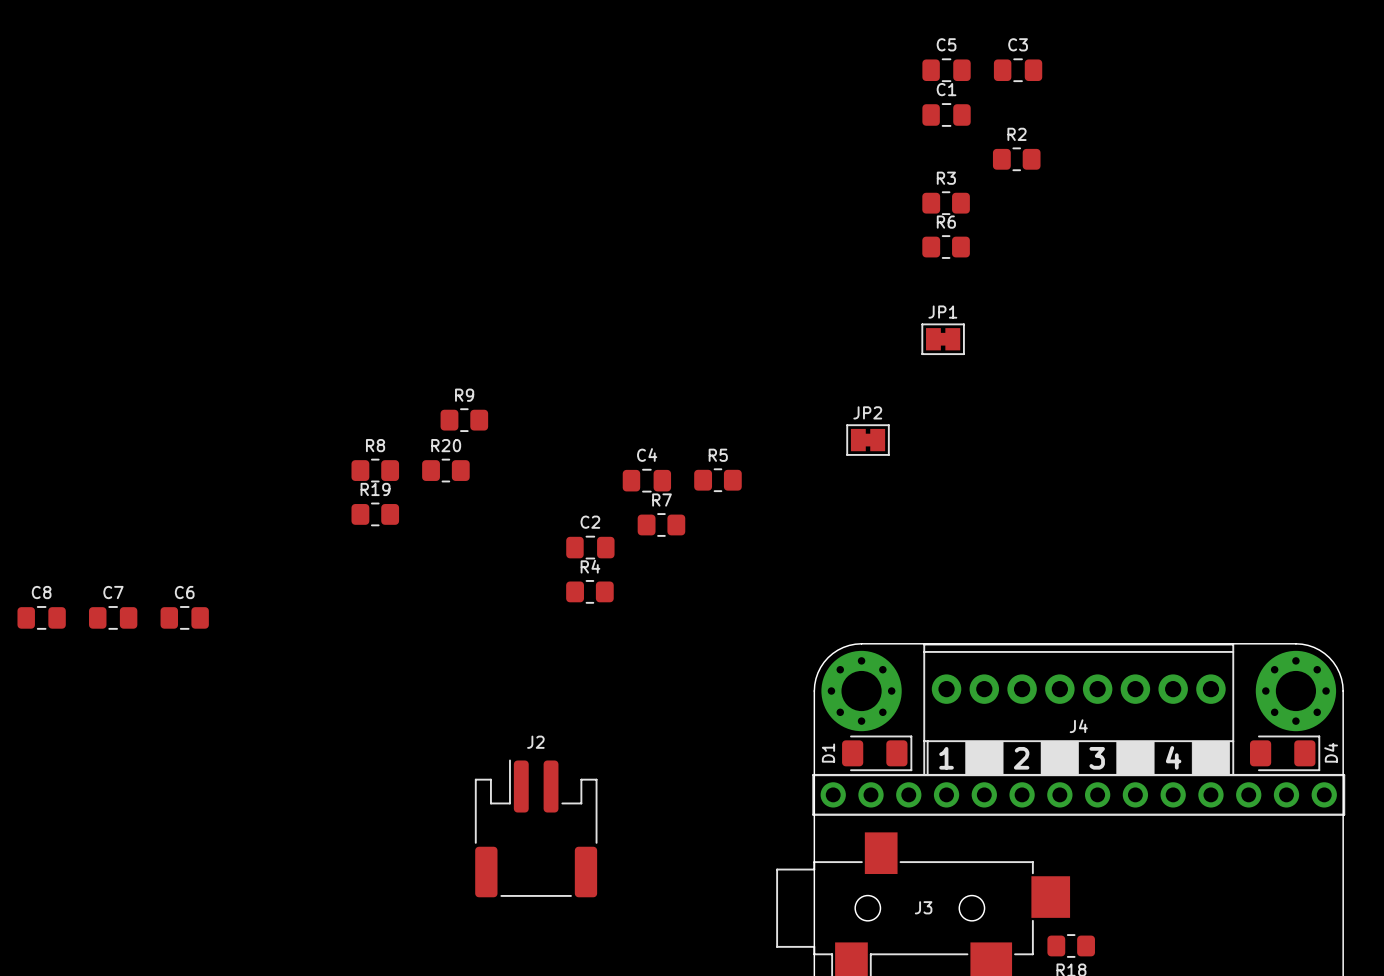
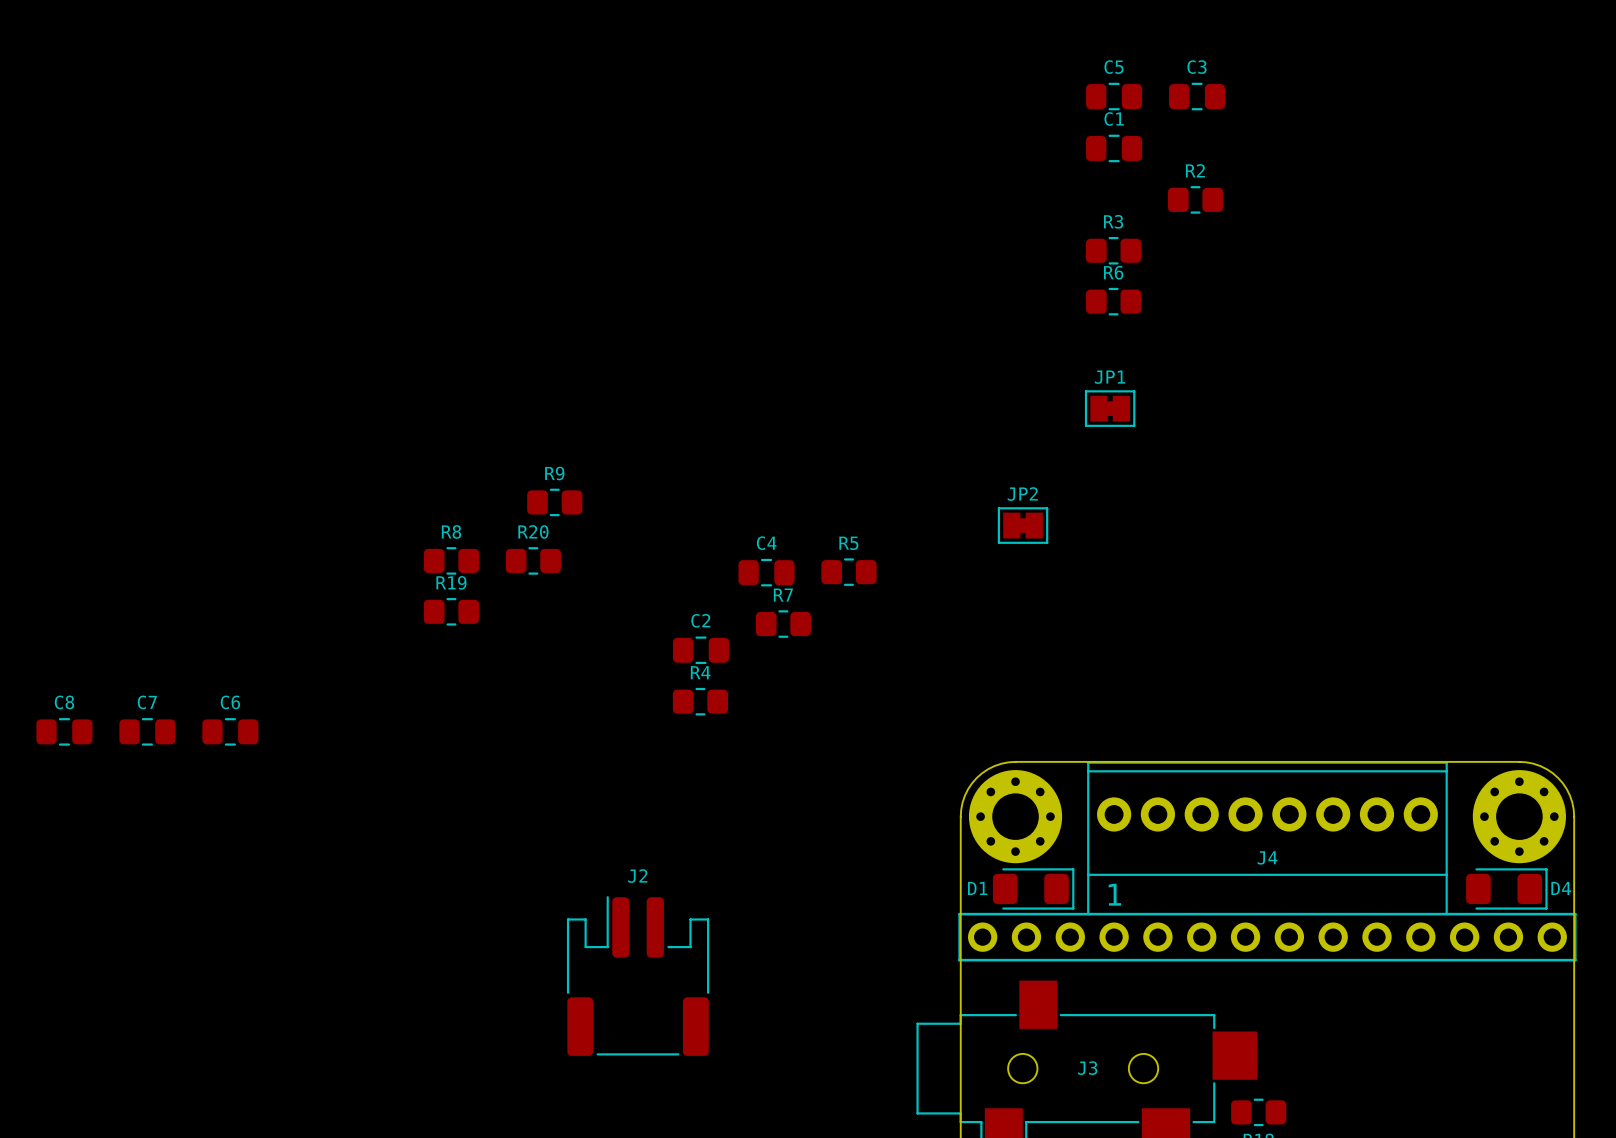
drawing: [965, 740, 1004, 776] -> none
drawing: [1040, 740, 1079, 776] -> none
drawing: [1116, 740, 1155, 776] -> none
drawing: [1191, 740, 1231, 776] -> none
line: (927, 741) (927, 774) -> none
D4 name rotation: 0° (1331, 752) -> 90° clockwise (1561, 888)
D1 name rotation: 0° (828, 753) -> 90° clockwise (977, 888)
text: 4 (1173, 757) -> none
text: 2 (1021, 758) -> none
text: 3 (1097, 758) -> none

